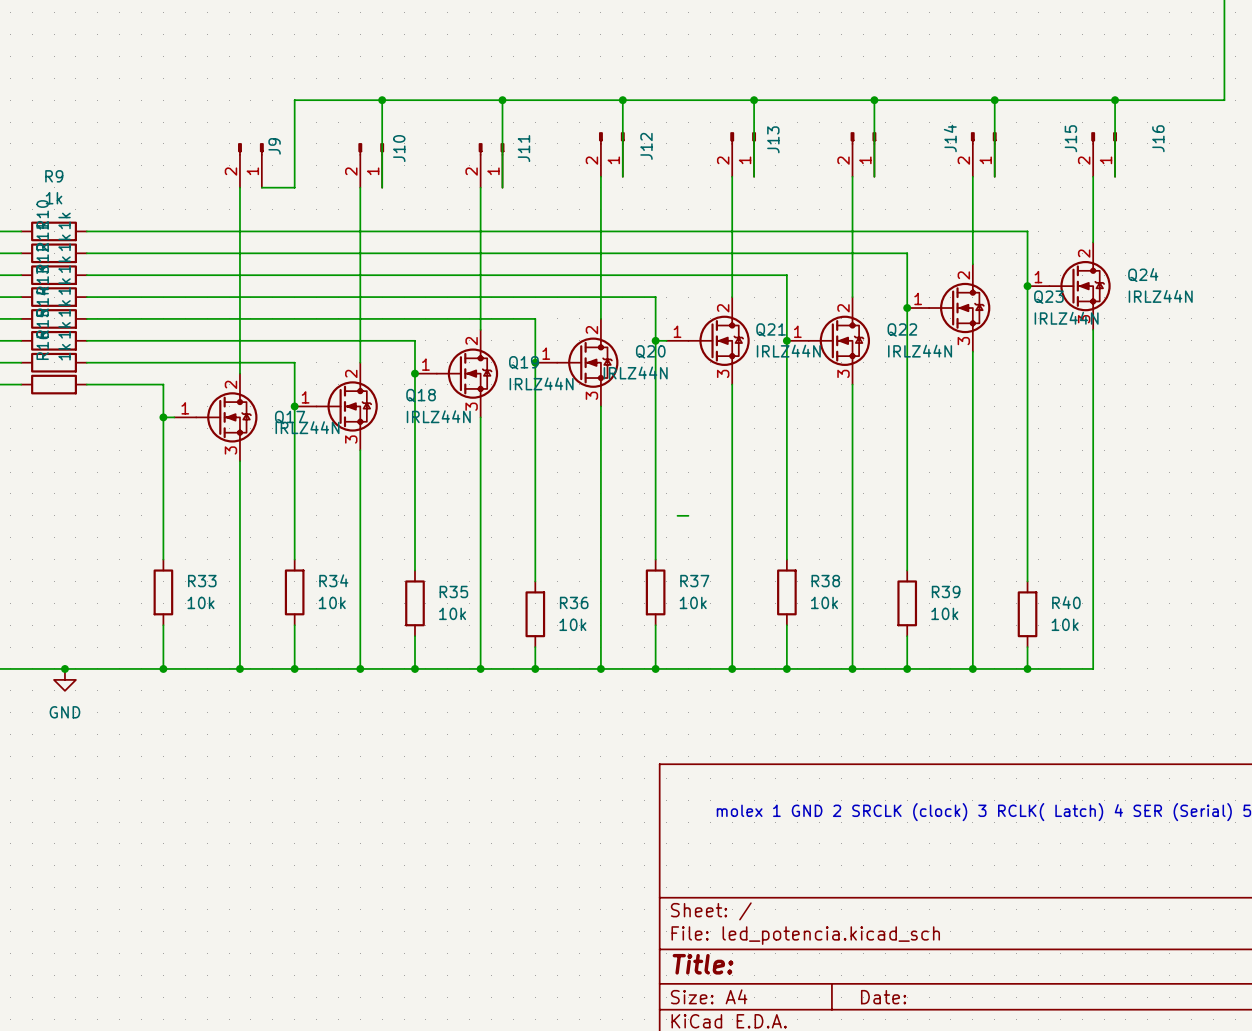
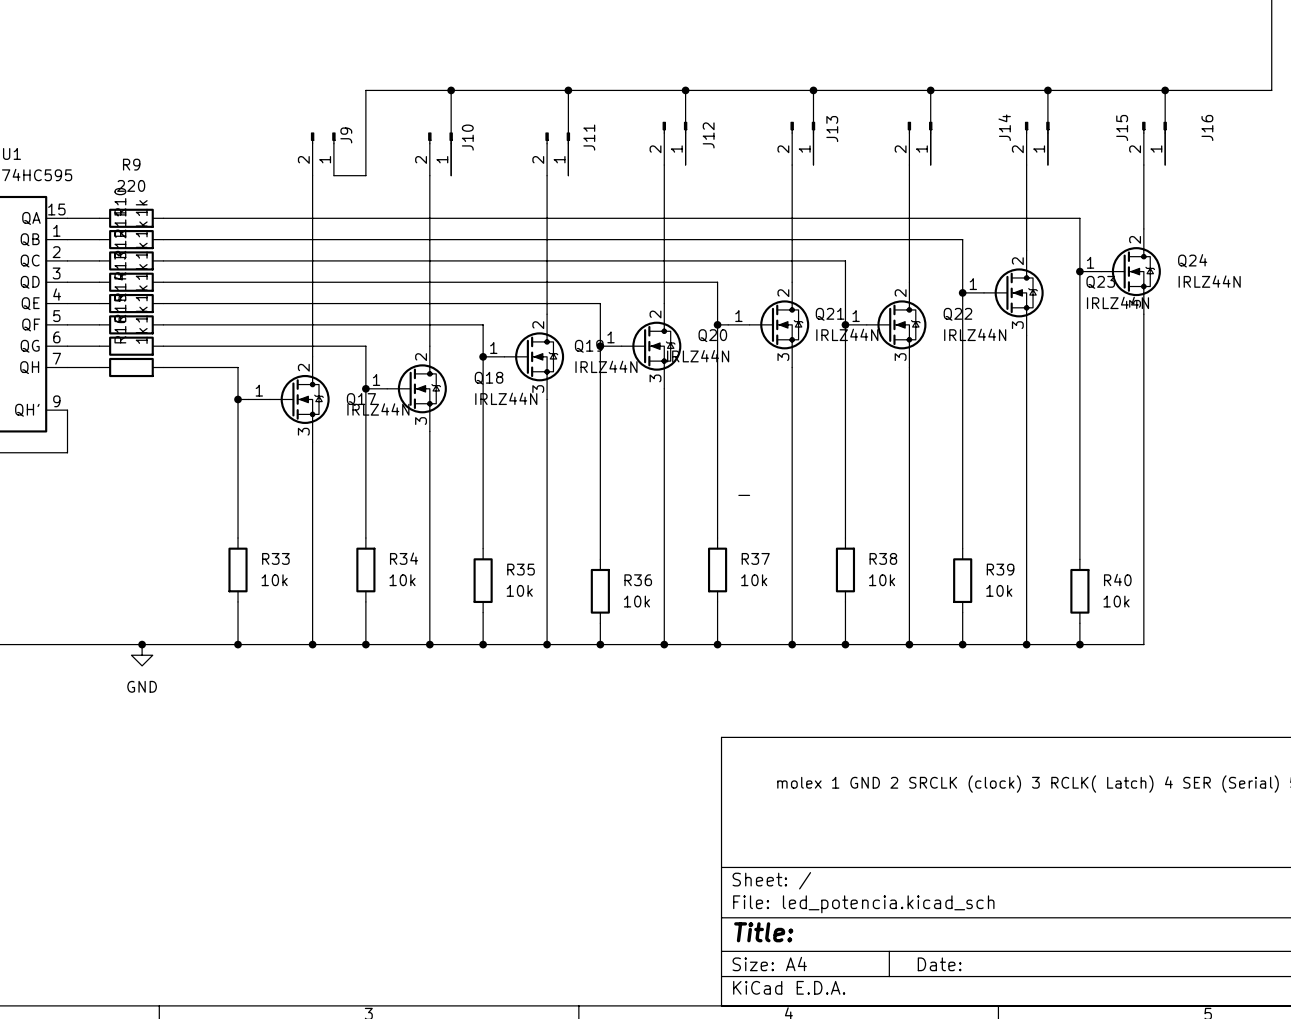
R9 value: 1k (54, 198) -> 220 (131, 185)

